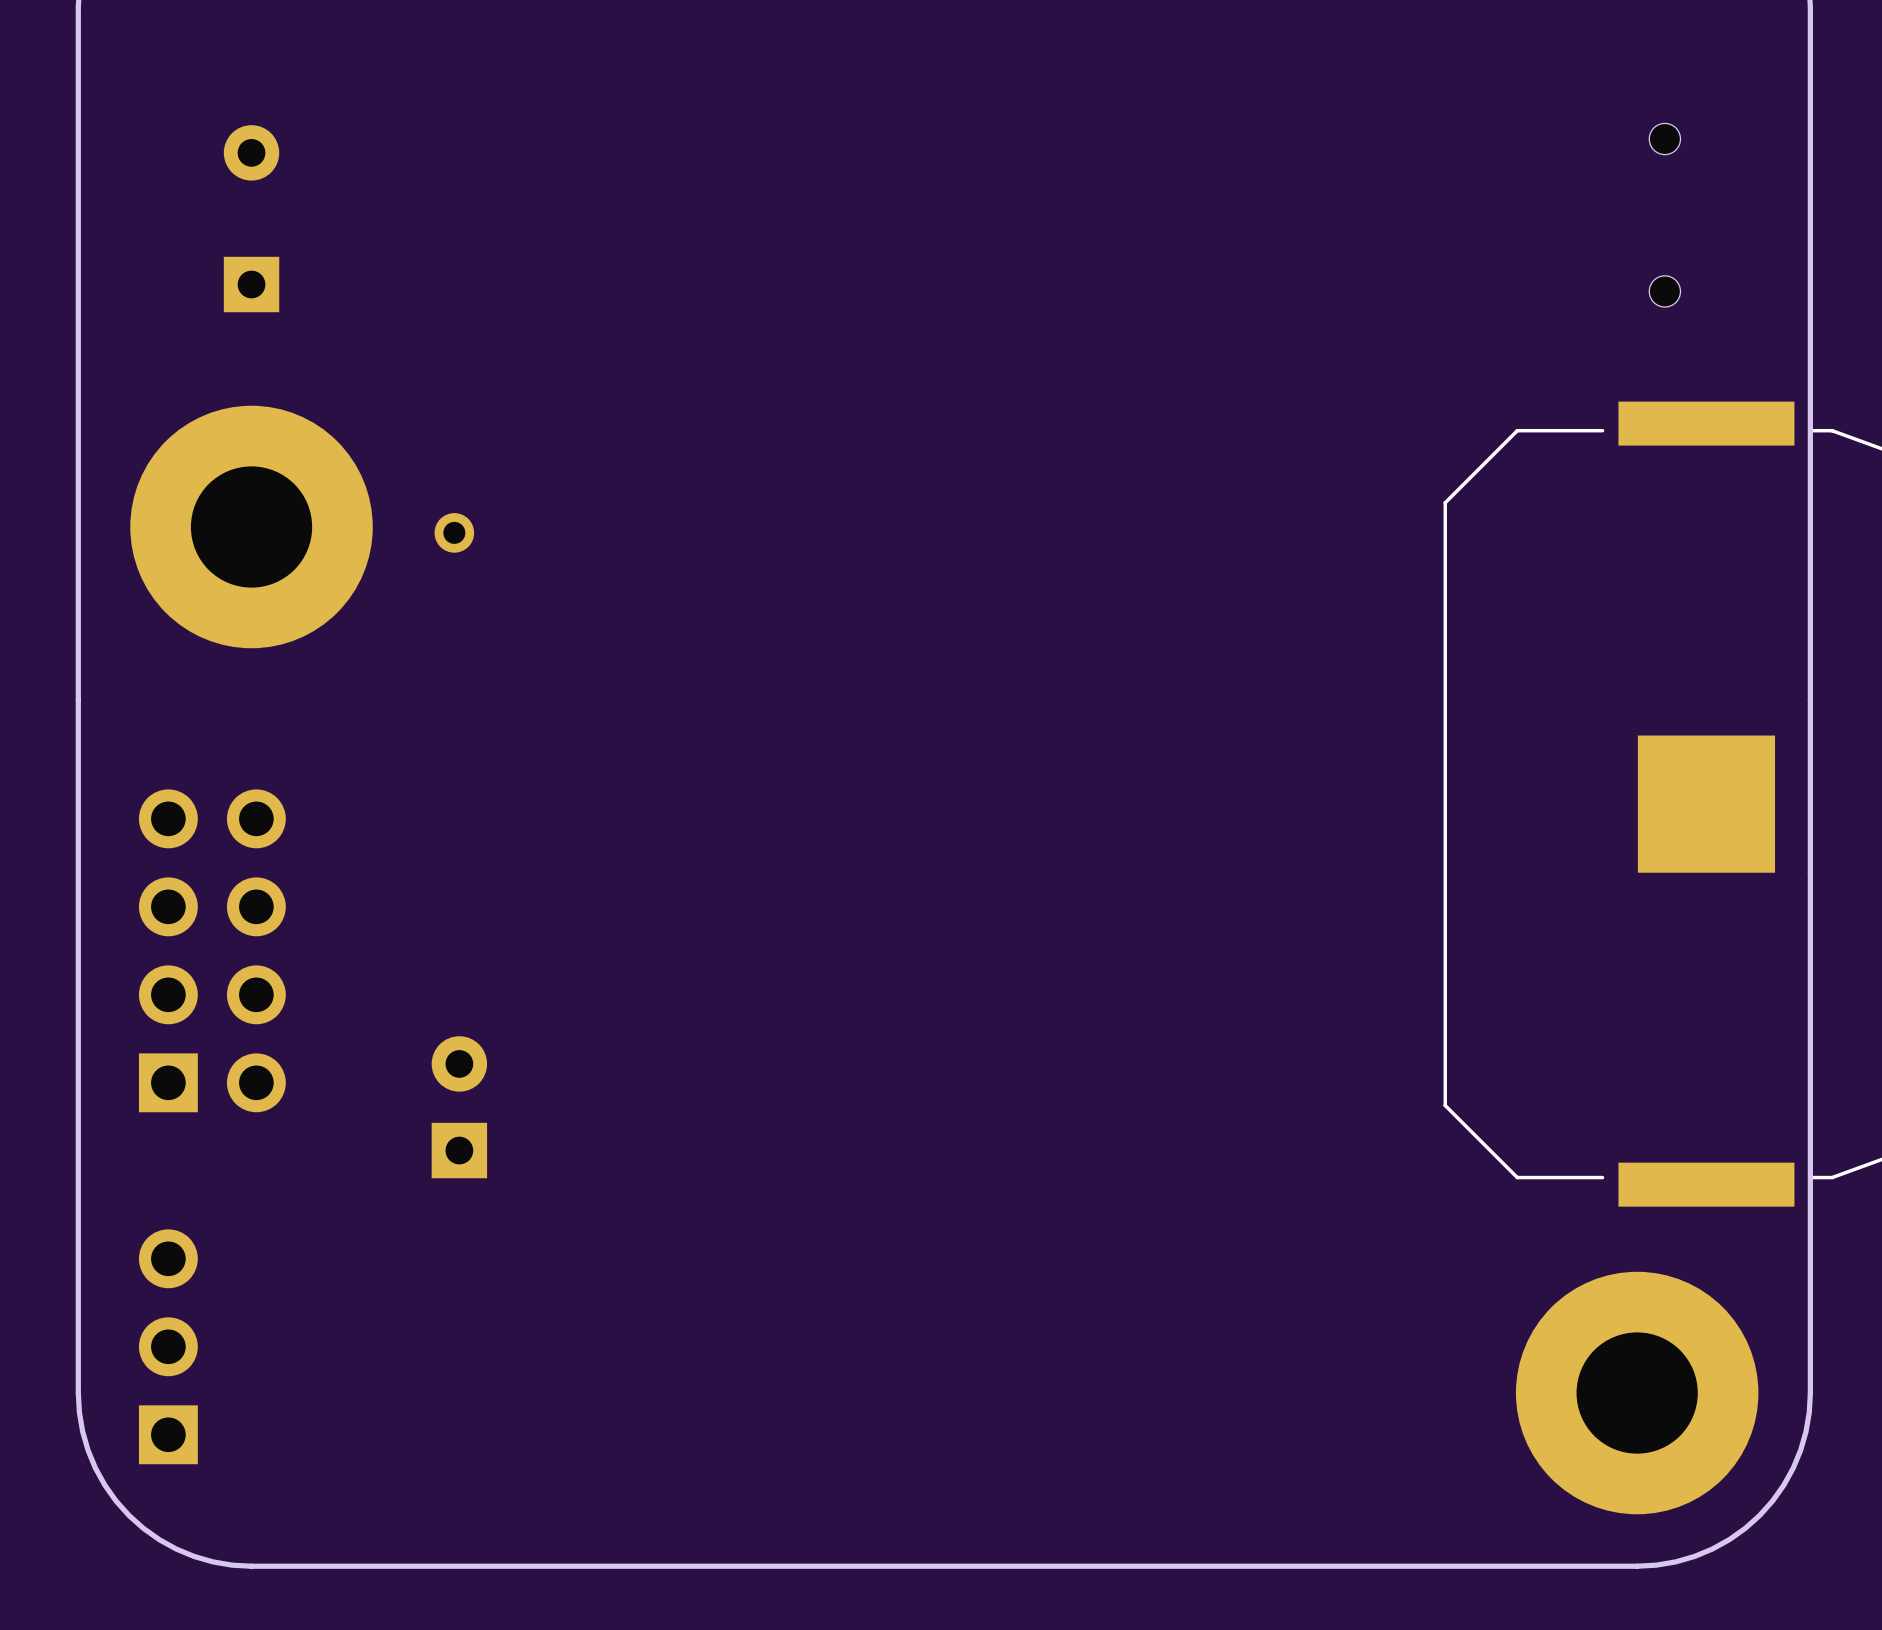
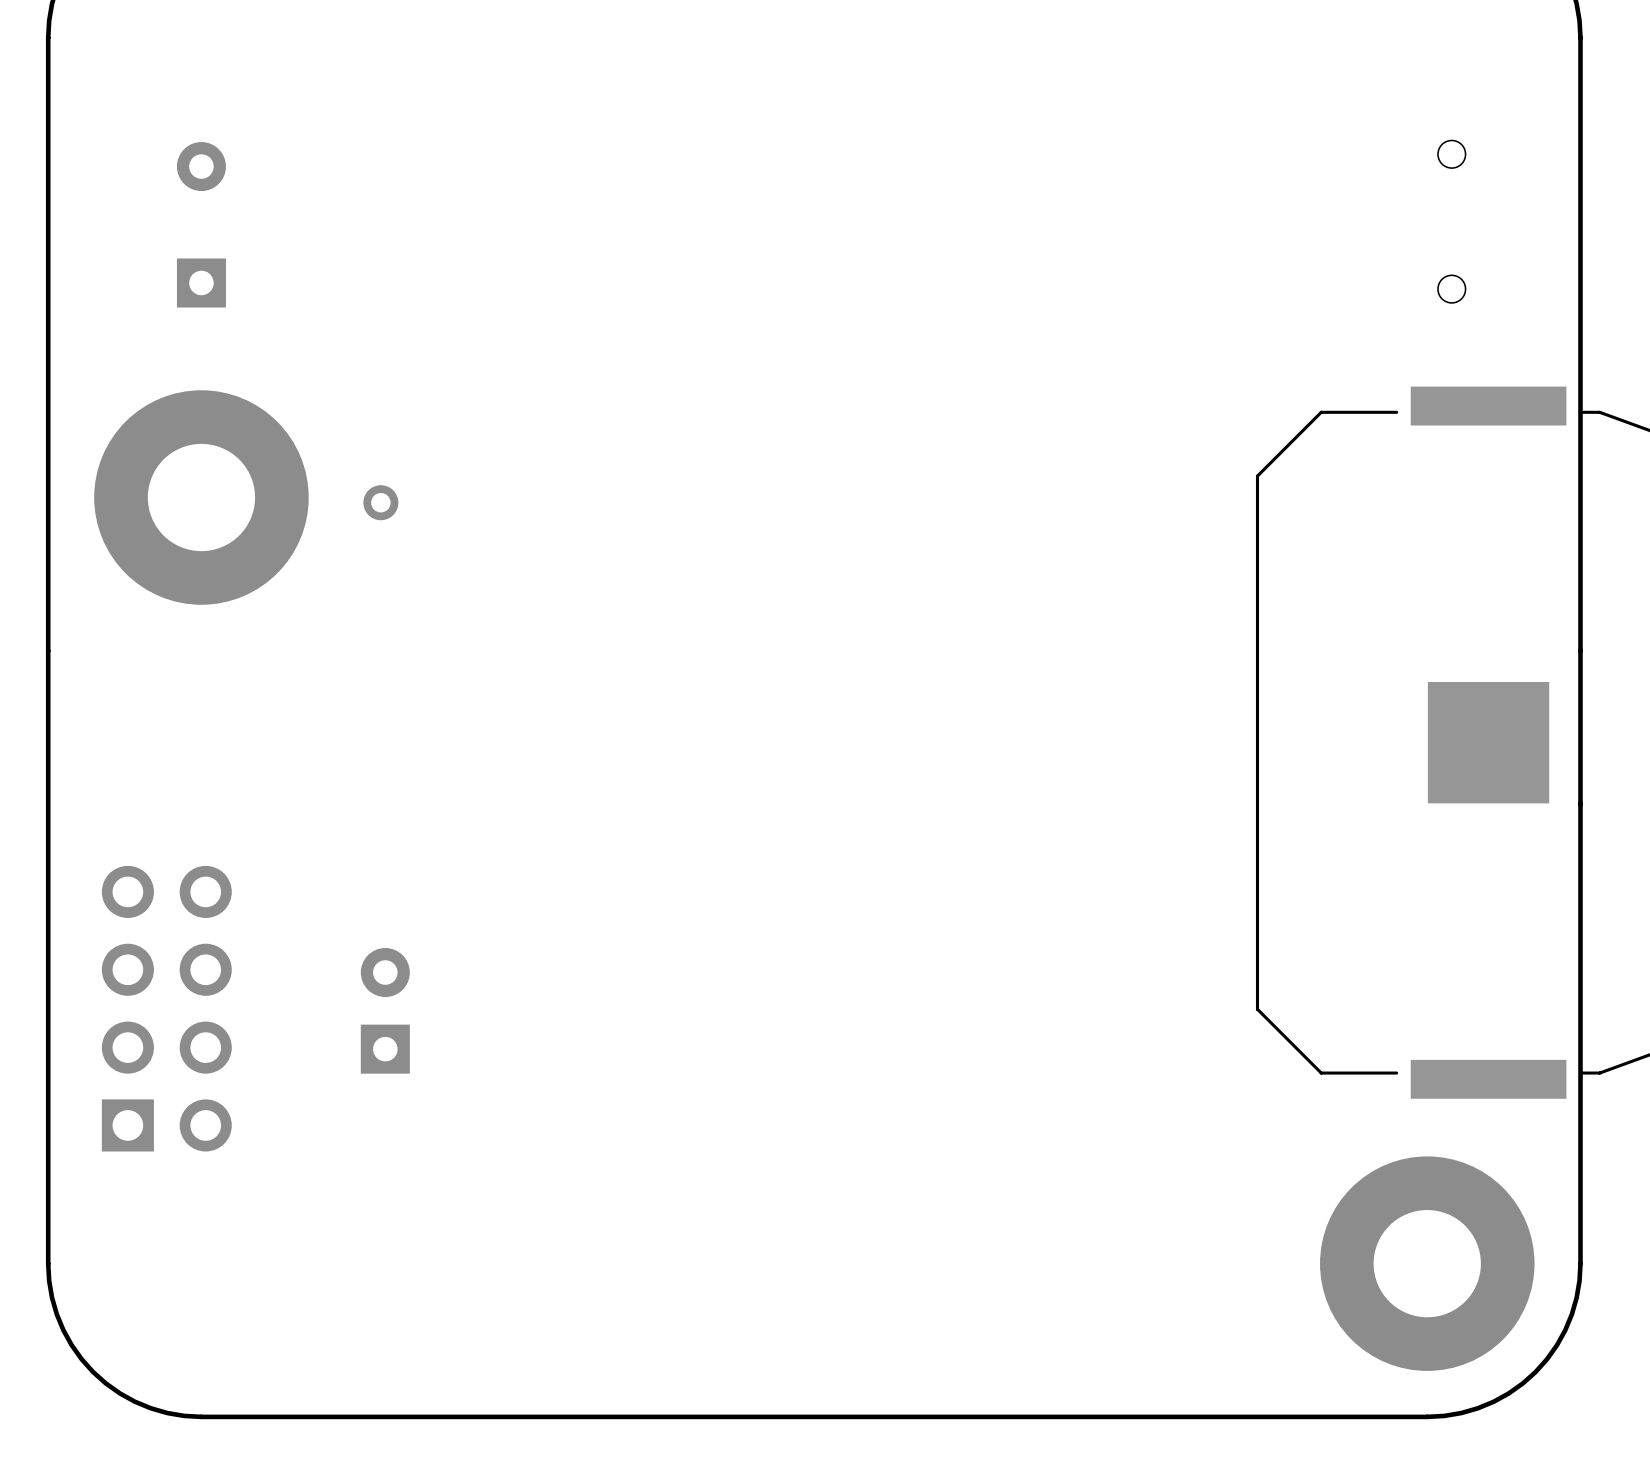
part position: (212, 950) -> (166, 1008)
part: (168, 1346) -> none

